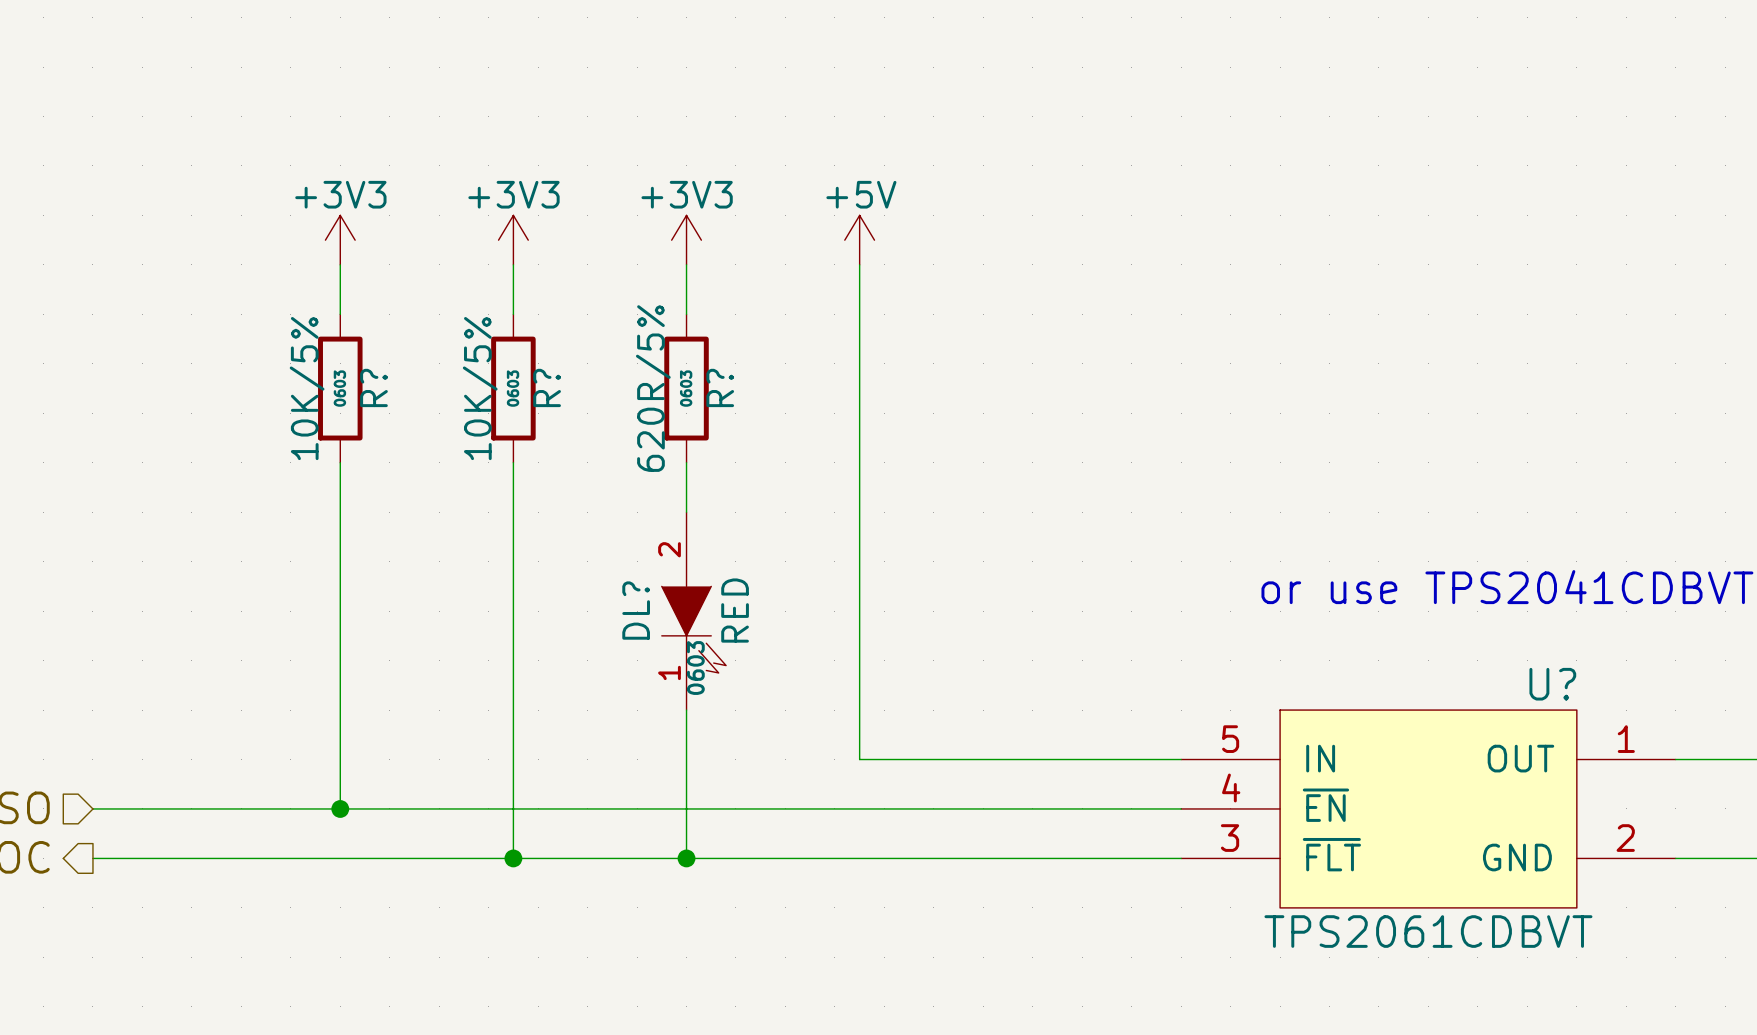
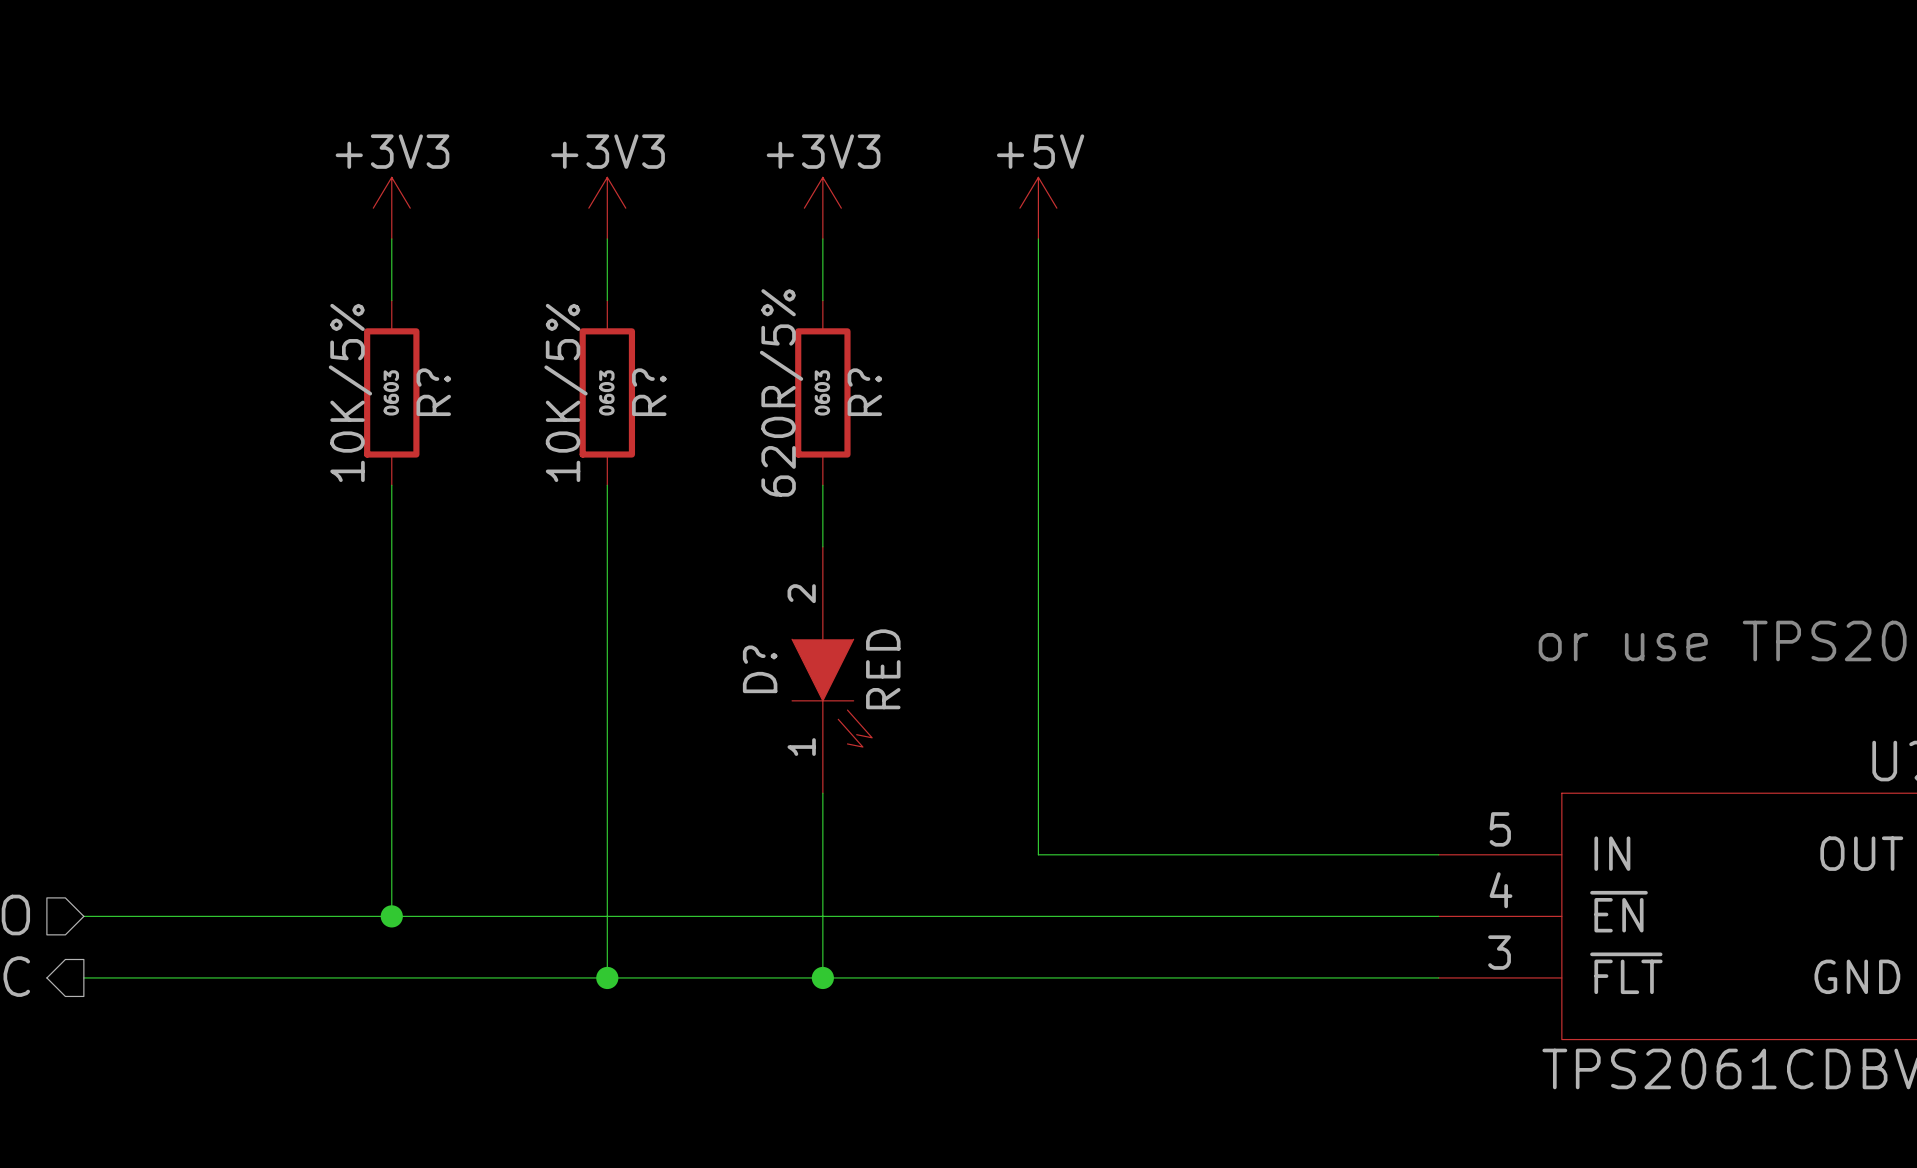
DL? name: DL? (636, 610) -> D? (760, 669)
DL? text: 0603 (695, 668) -> none

